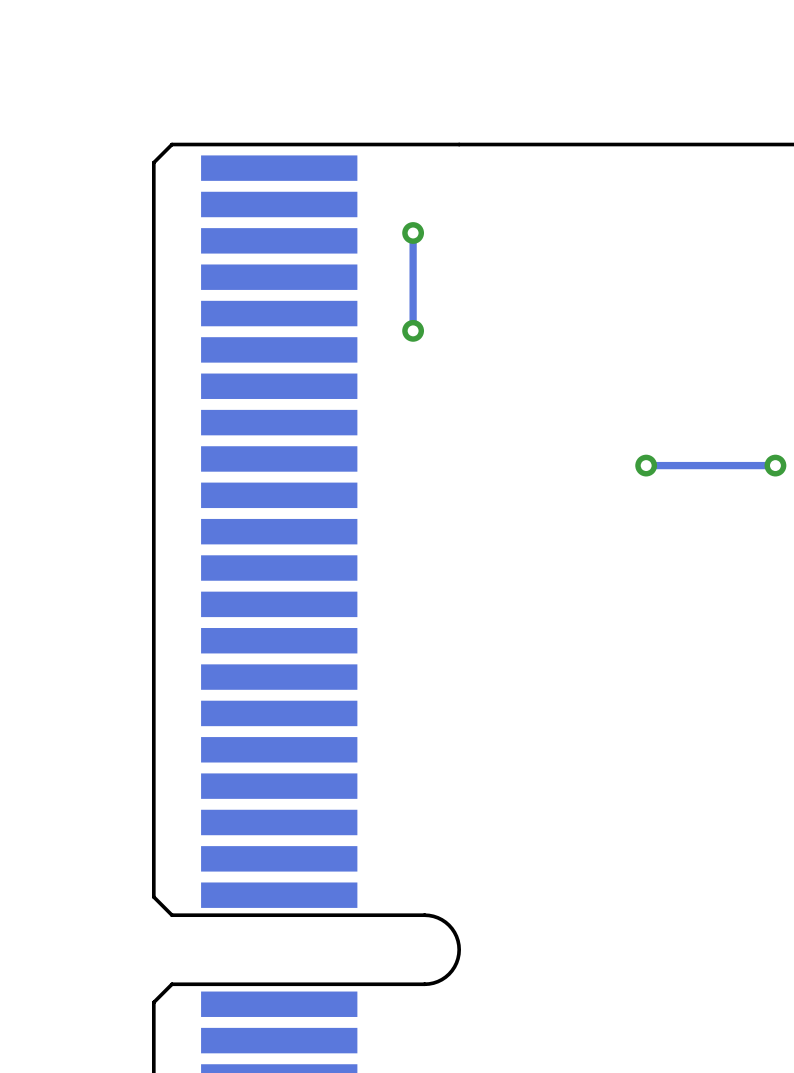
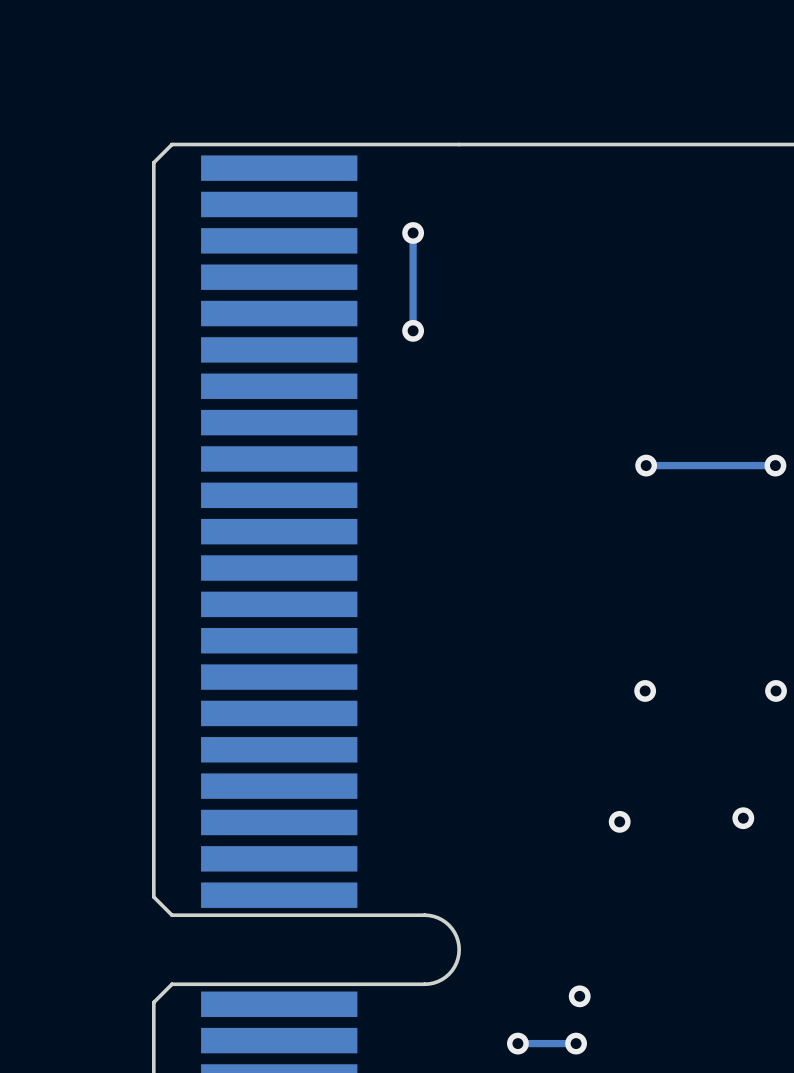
via: none -> (645, 690)
via: none -> (776, 690)
via: none -> (743, 818)
via: none -> (619, 821)
via: none -> (579, 996)
via: none -> (517, 1043)
track: none -> (576, 1043) (517, 1043)
via: none -> (576, 1043)

